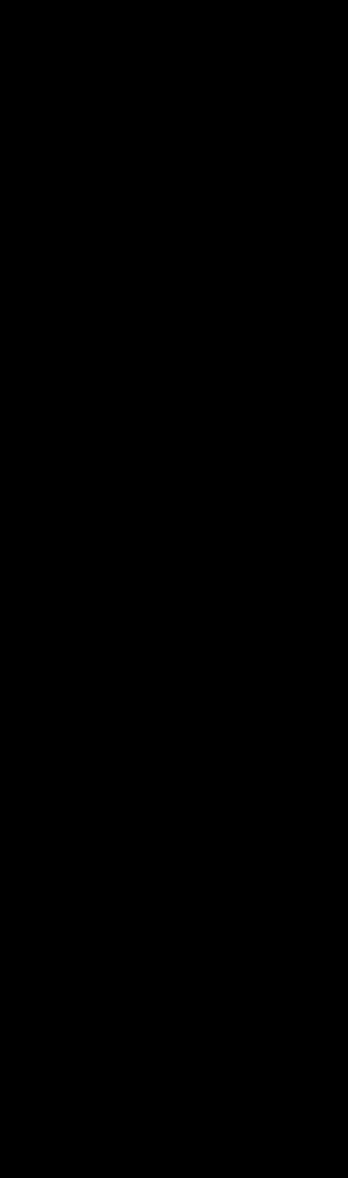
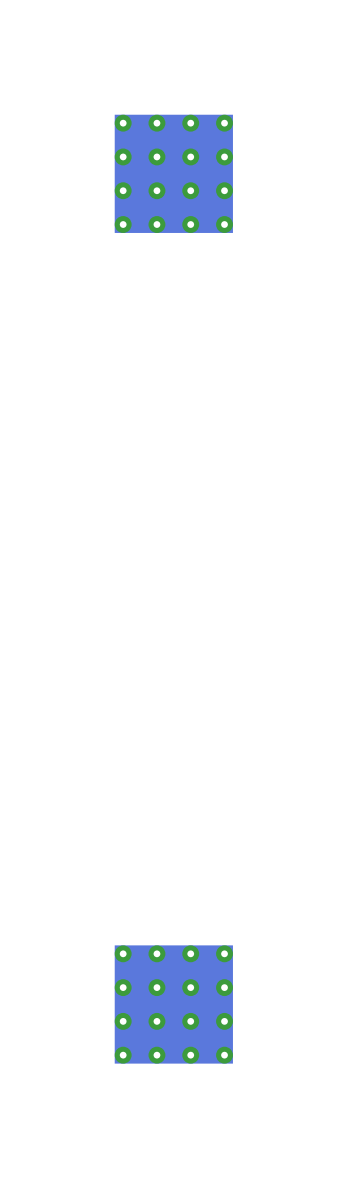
part: none -> (173, 173)
part: none -> (173, 1004)

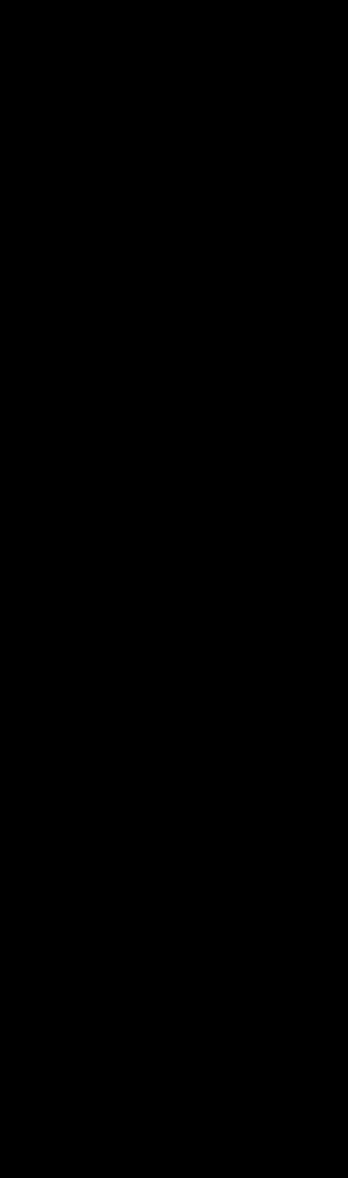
part: (173, 173) -> none
part: (173, 1004) -> none

